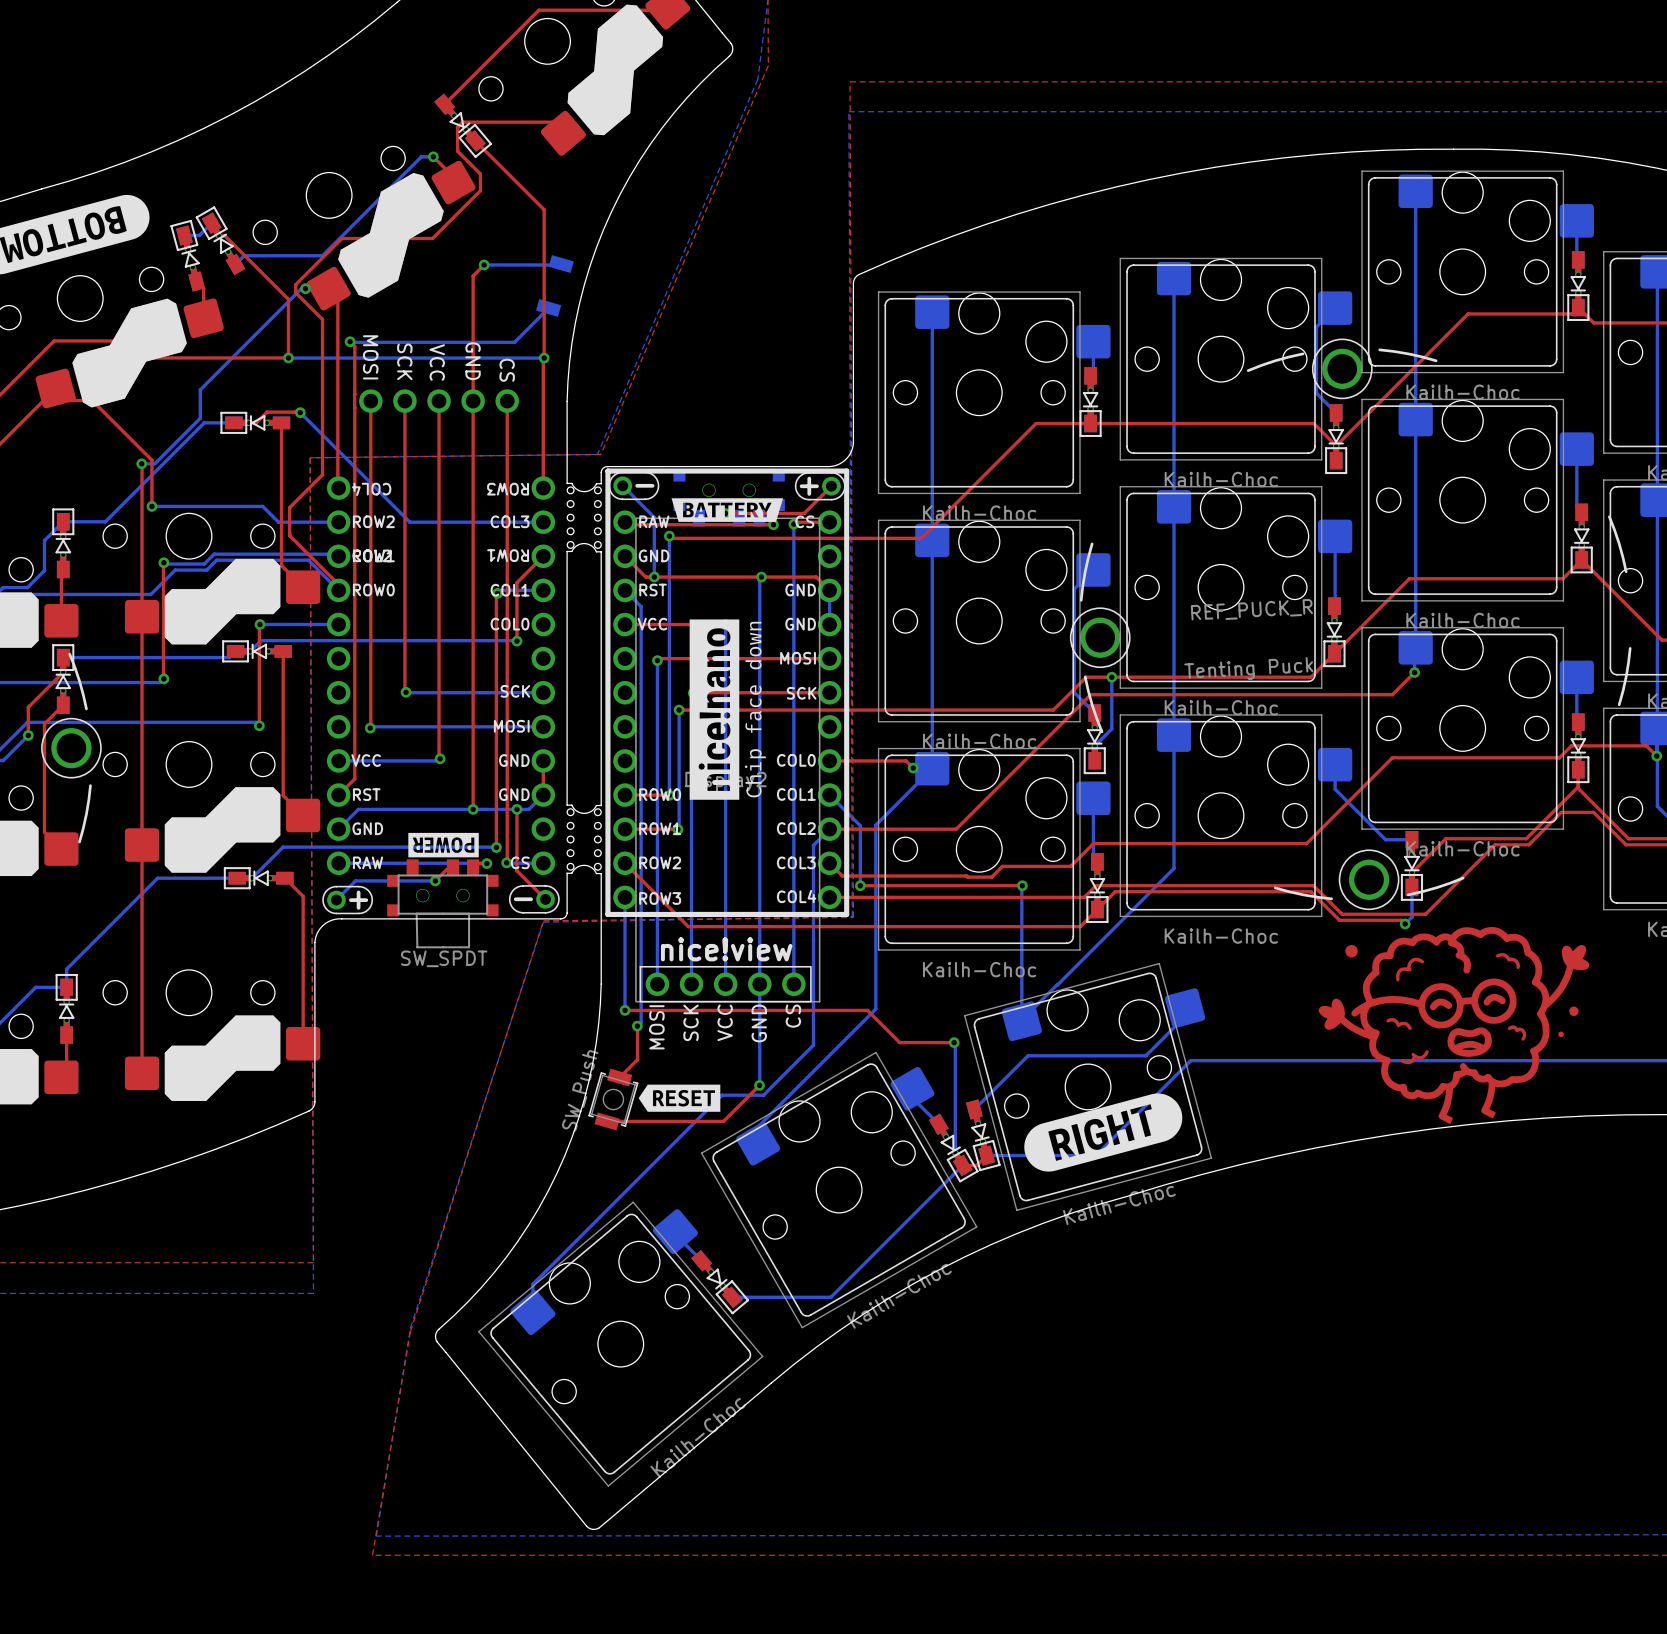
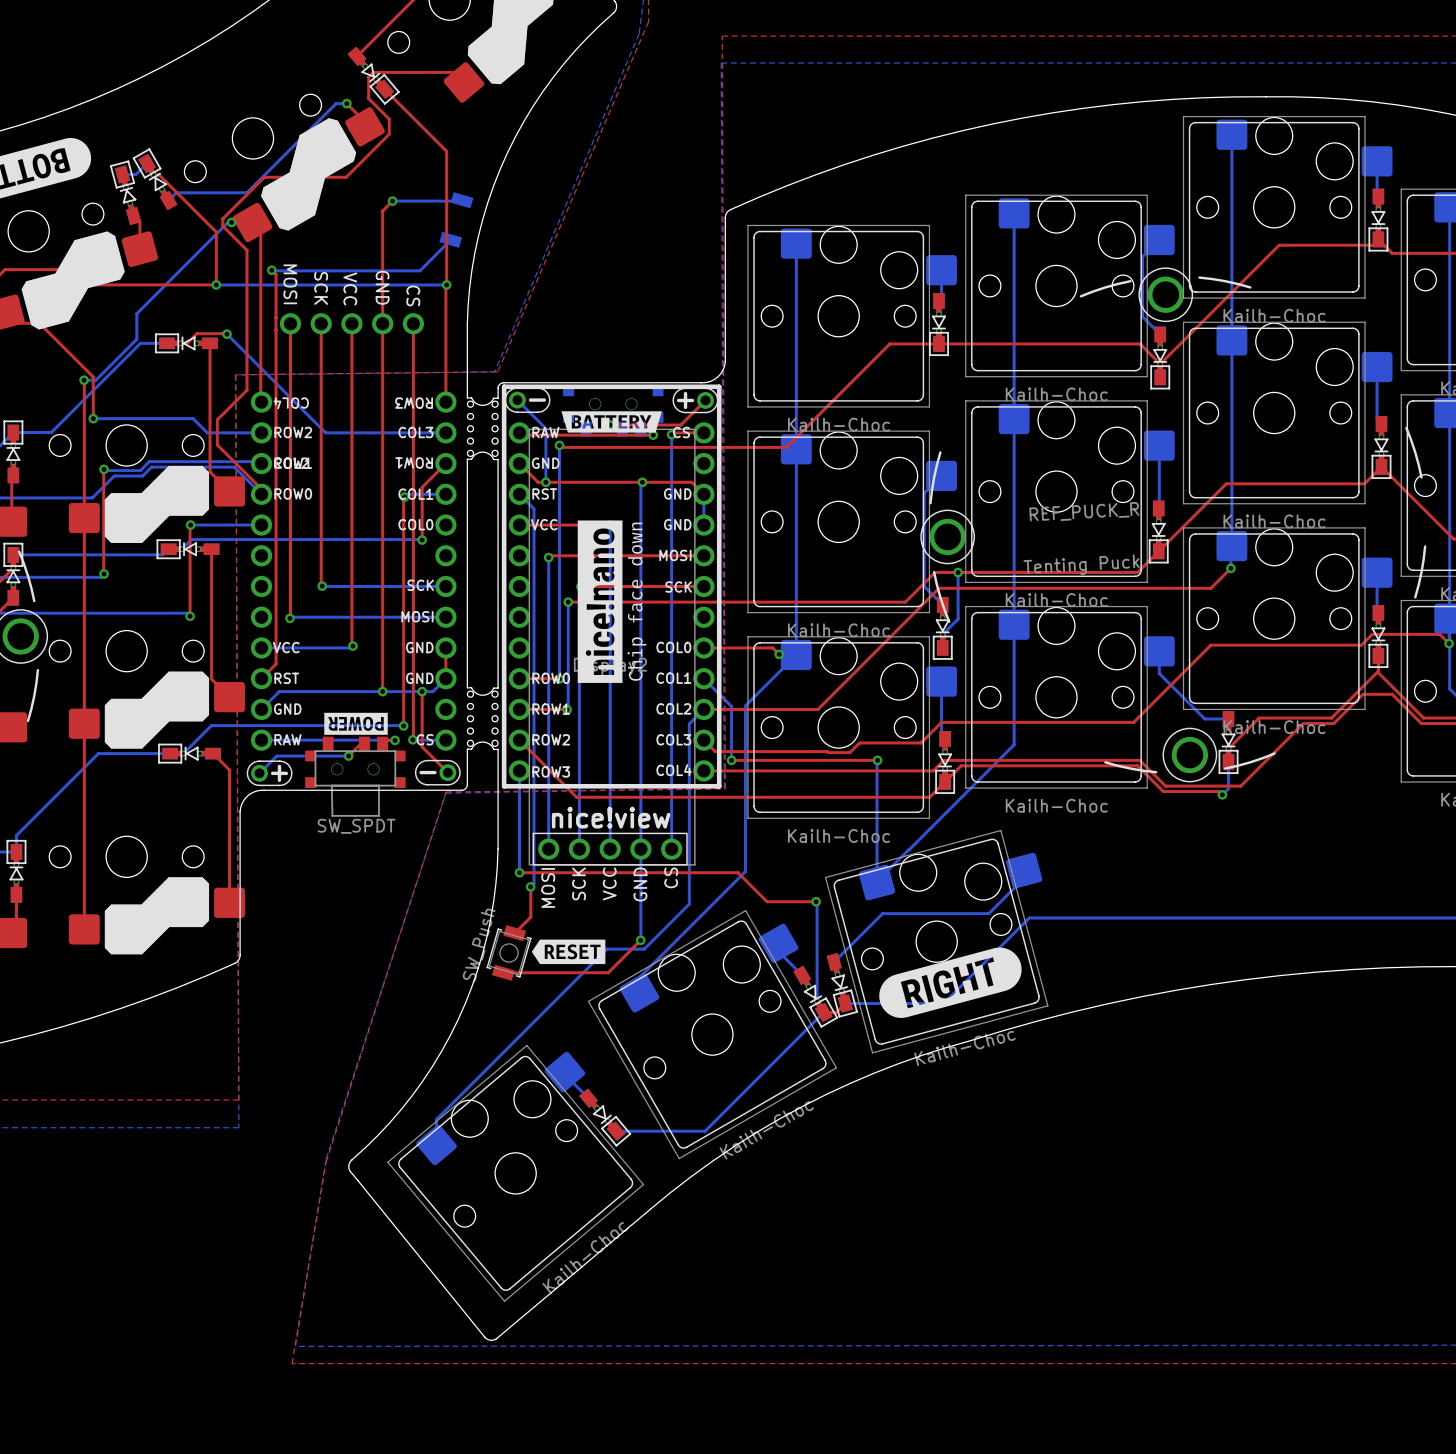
drawing: [1318, 927, 1590, 1125] -> none

